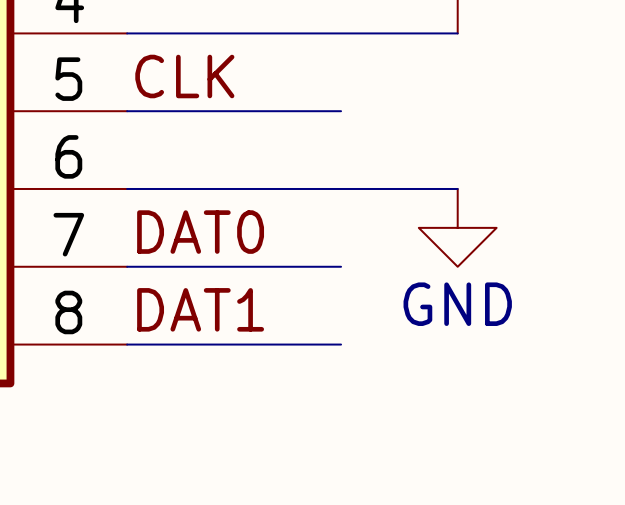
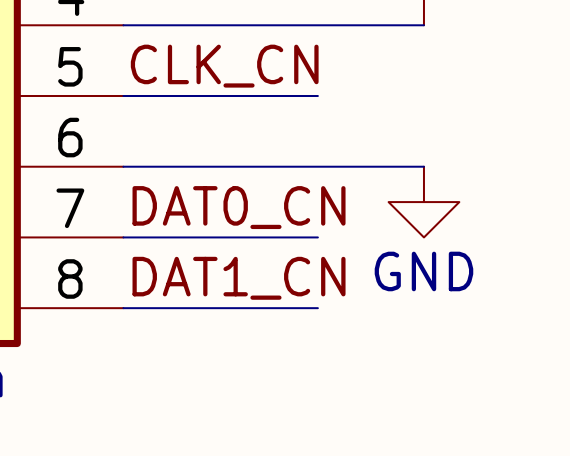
label: CLK (184, 76) -> CLK_CN (224, 66)
label: DAT0 (200, 232) -> DAT0_CN (239, 207)
label: DAT1 (200, 309) -> DAT1_CN (239, 278)

